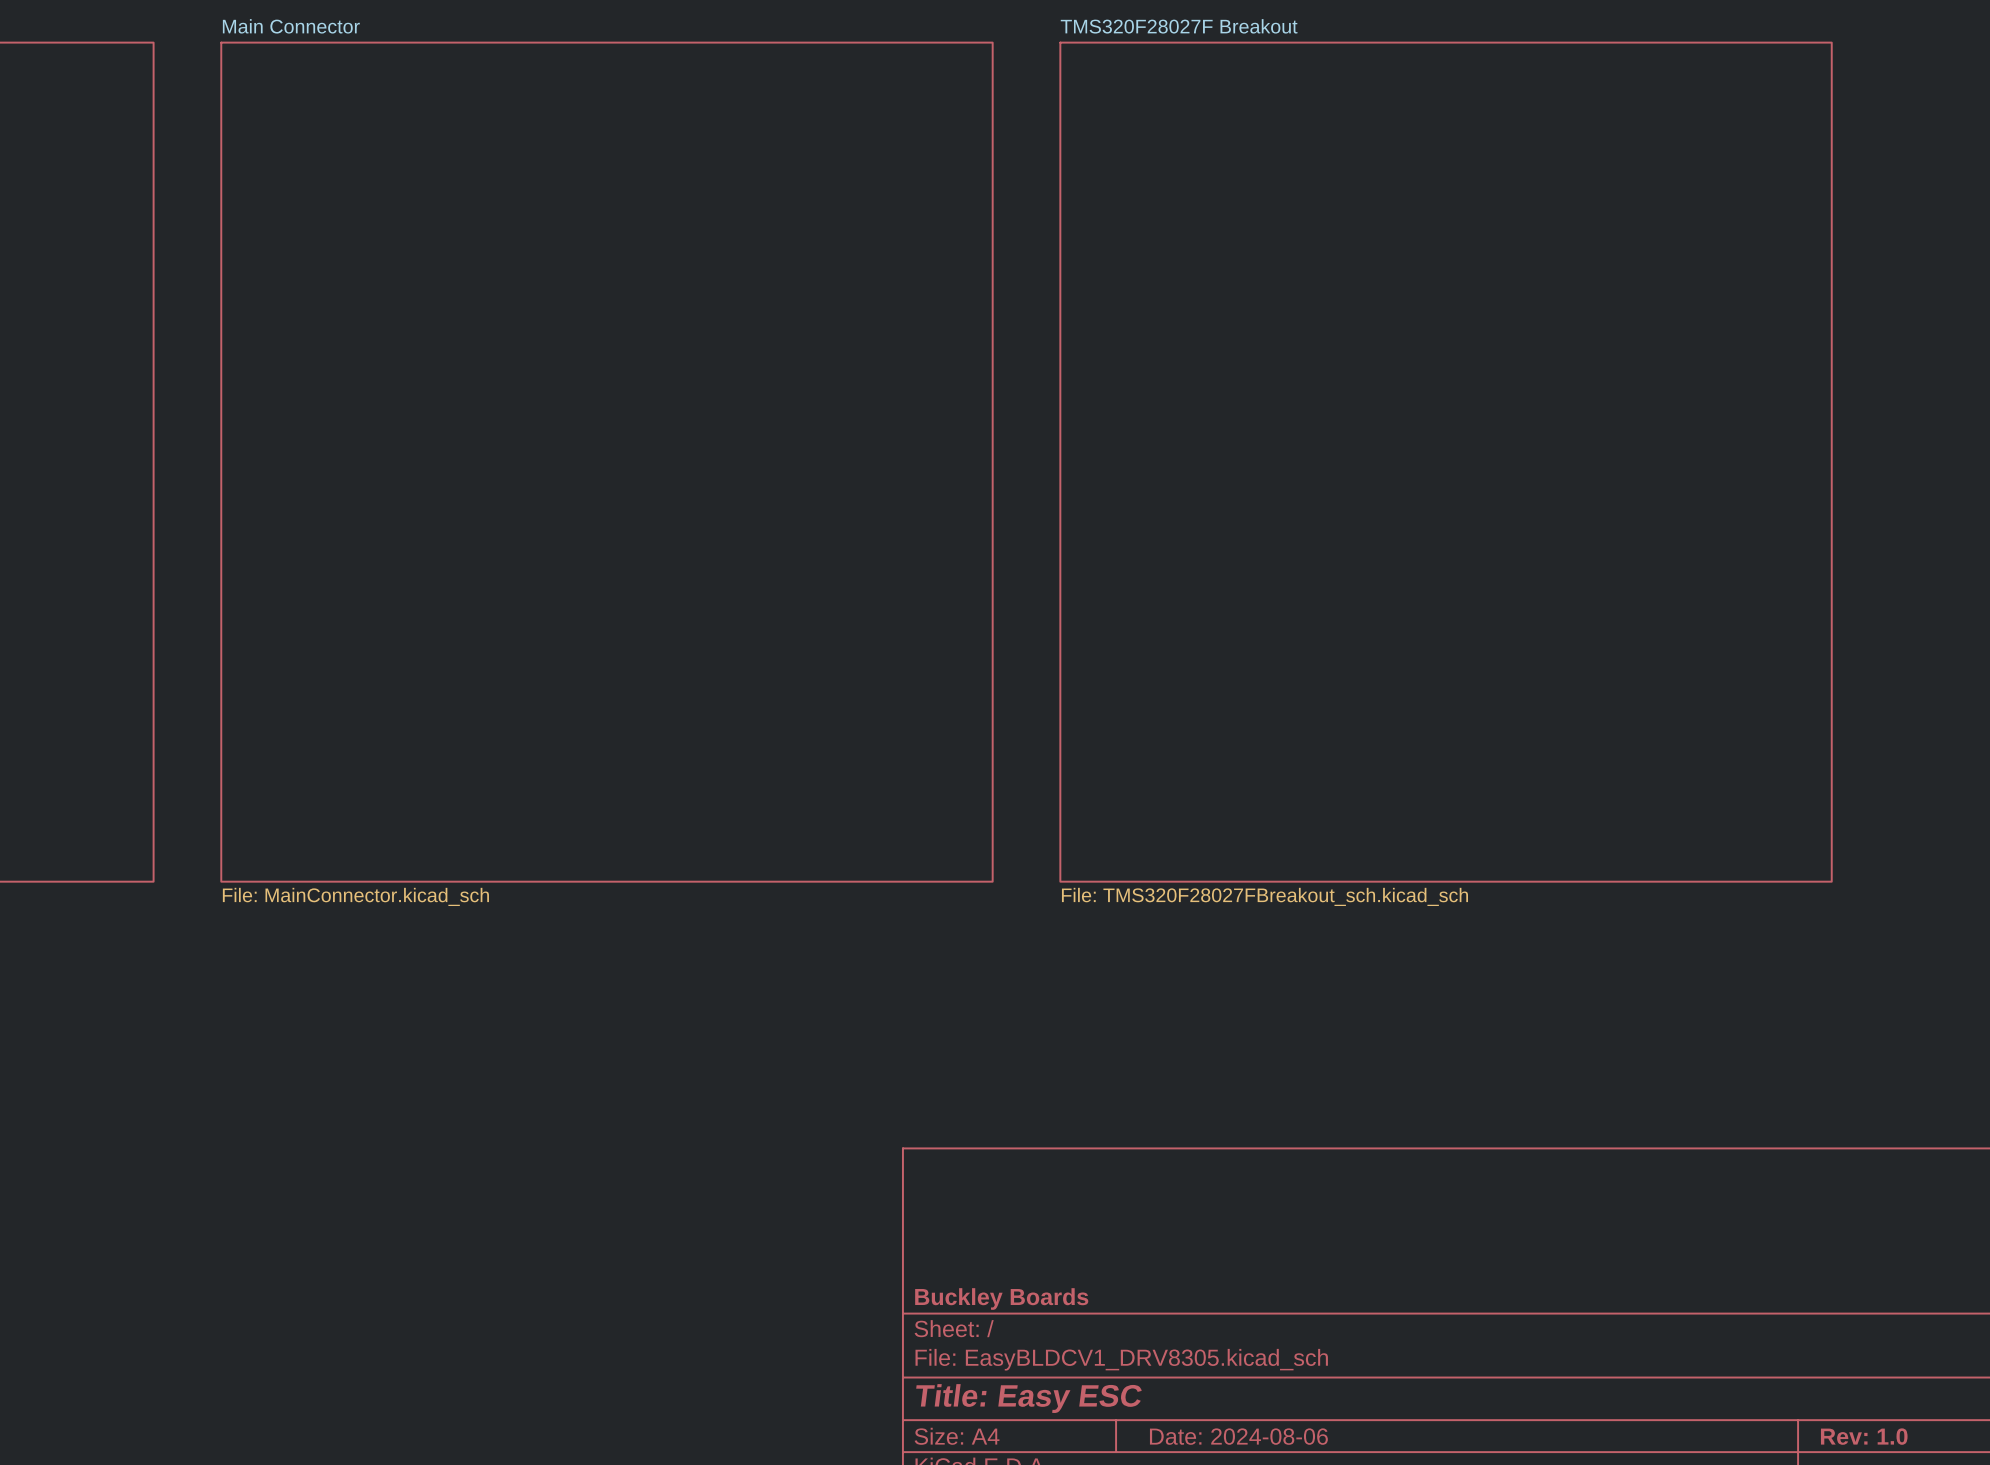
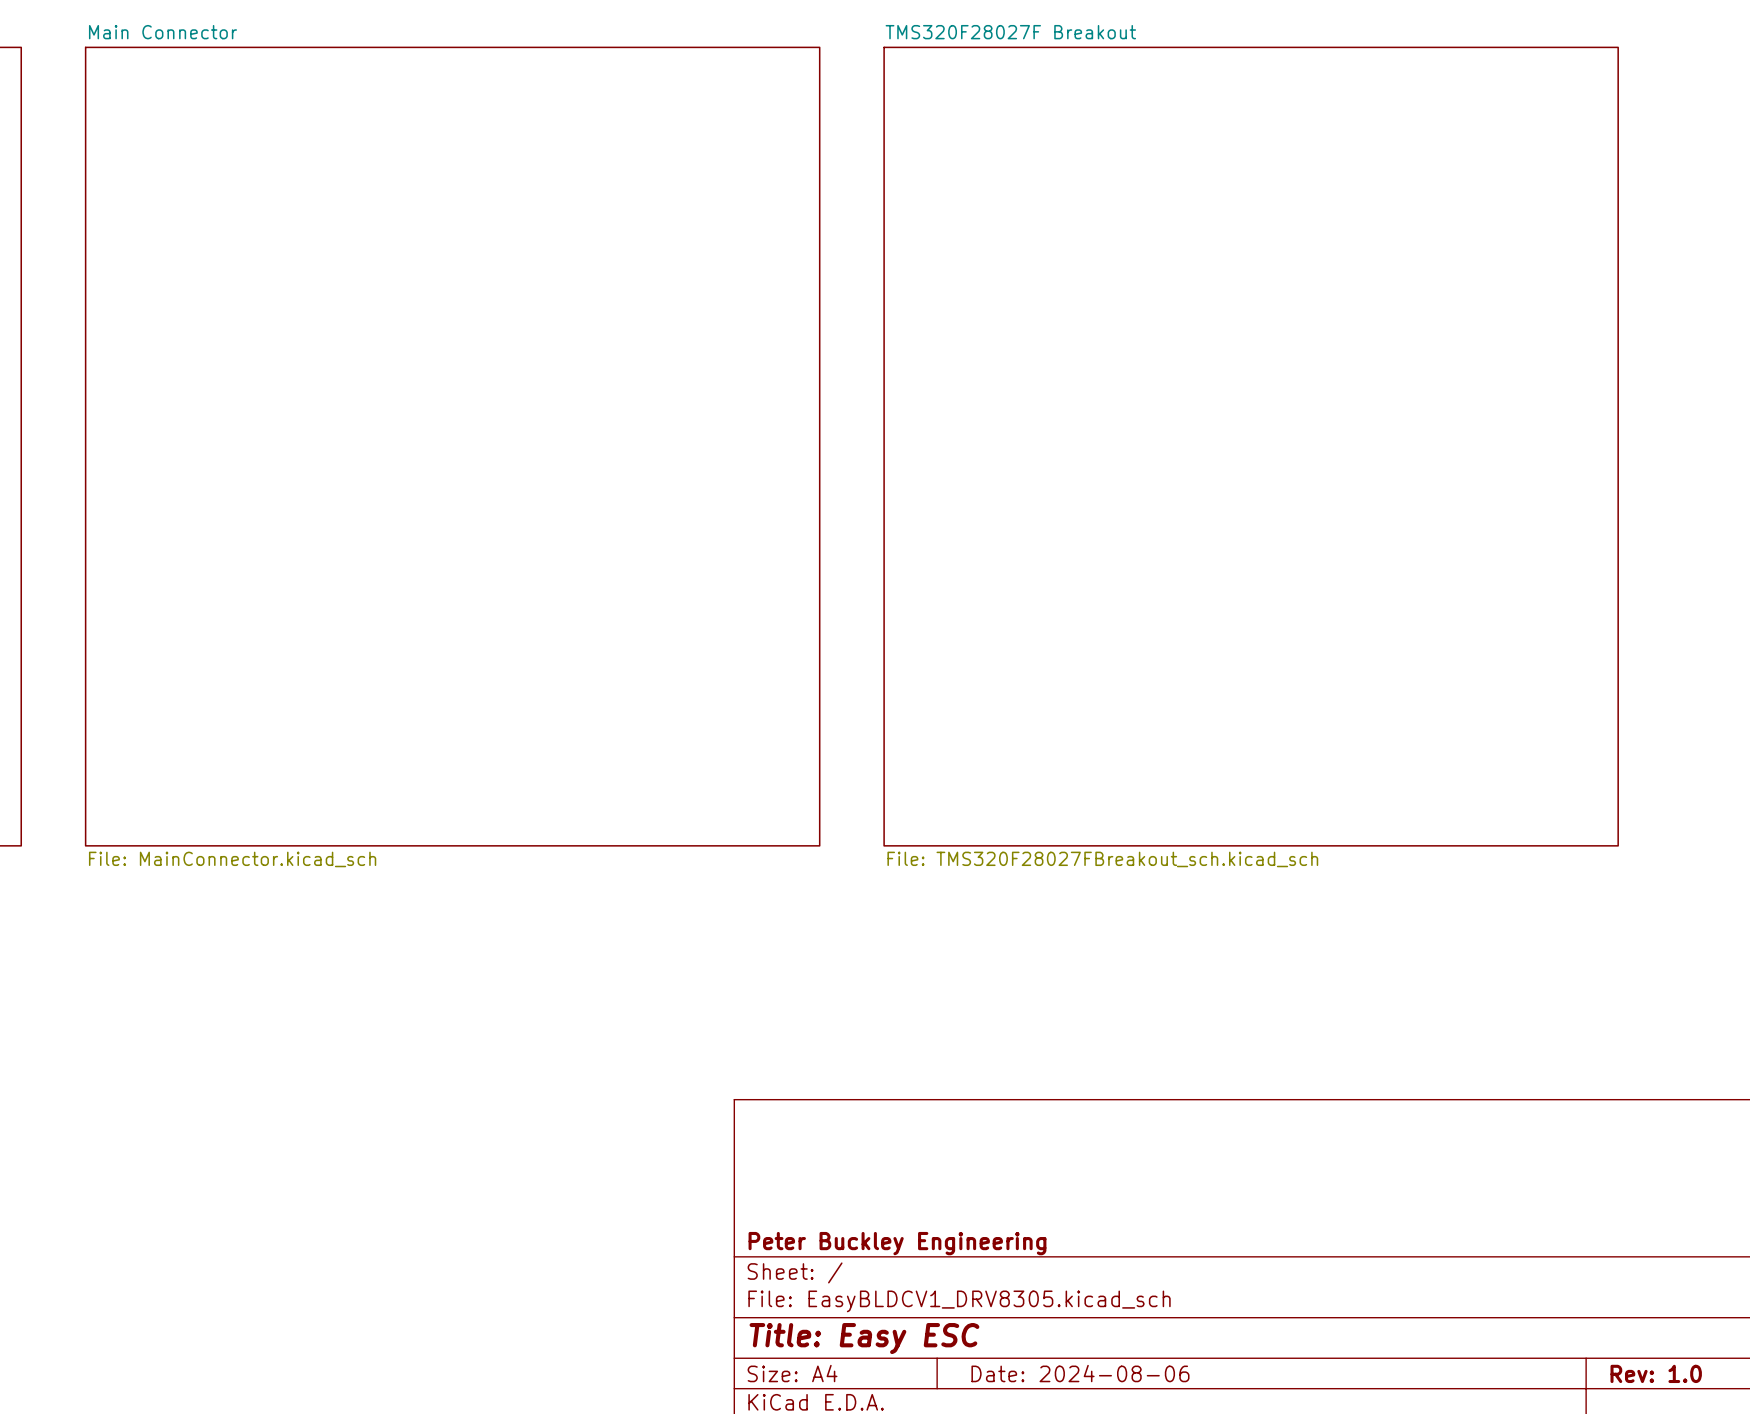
title block: Buckley Boards (1001, 1298) -> Peter Buckley Engineering (897, 1243)

